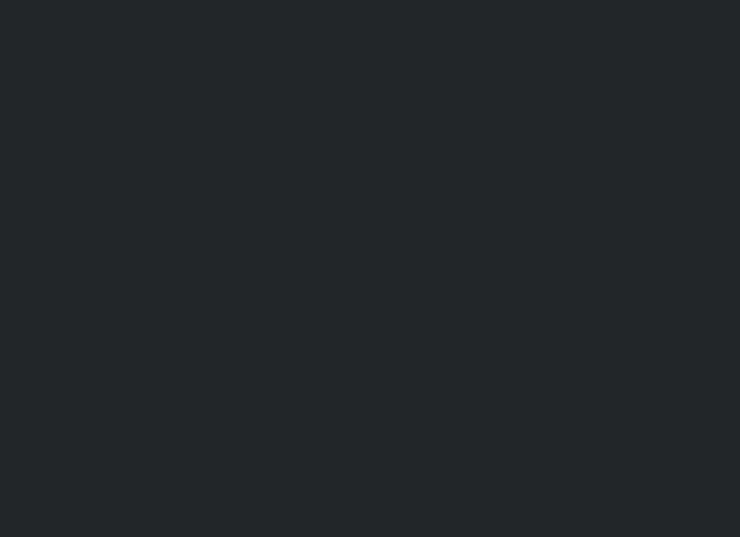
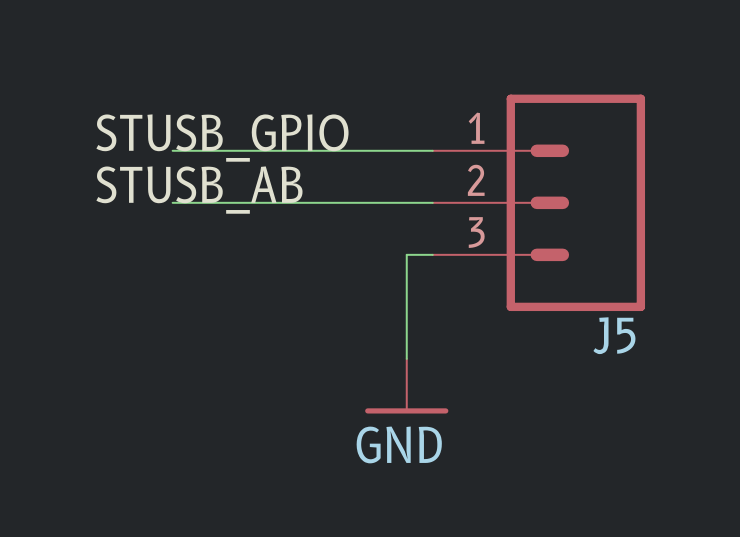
label: none -> STUSB_GPIO (222, 138)
wire: none -> (172, 150) (432, 150)
label: none -> STUSB_AB (199, 190)
wire: none -> (172, 202) (432, 202)
J5: none -> (538, 202)
wire: none -> (432, 254) (406, 254) (406, 358)
power symbol: none -> GND (406, 386)

